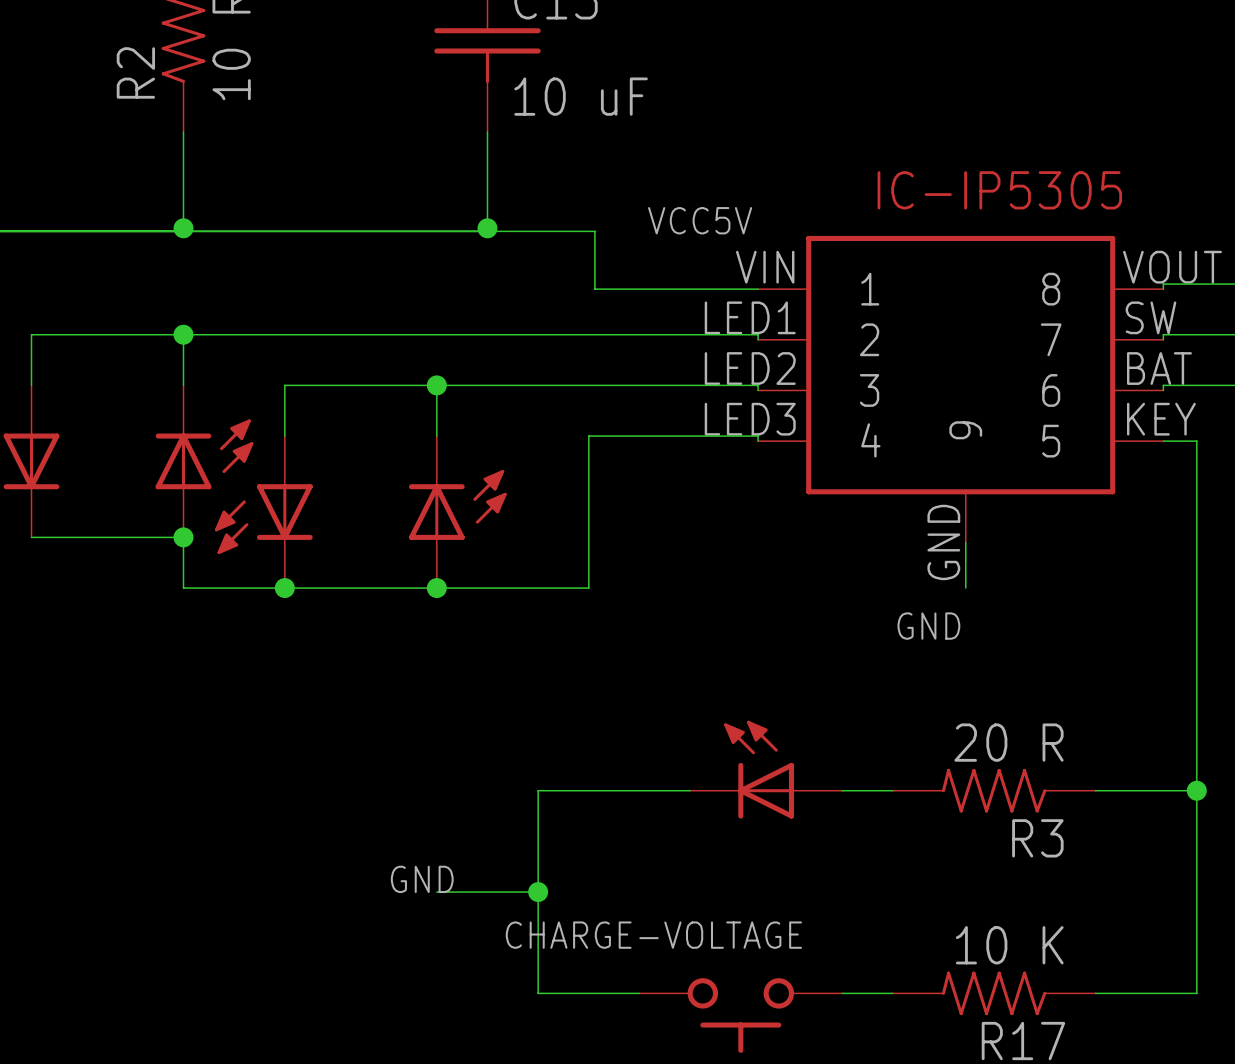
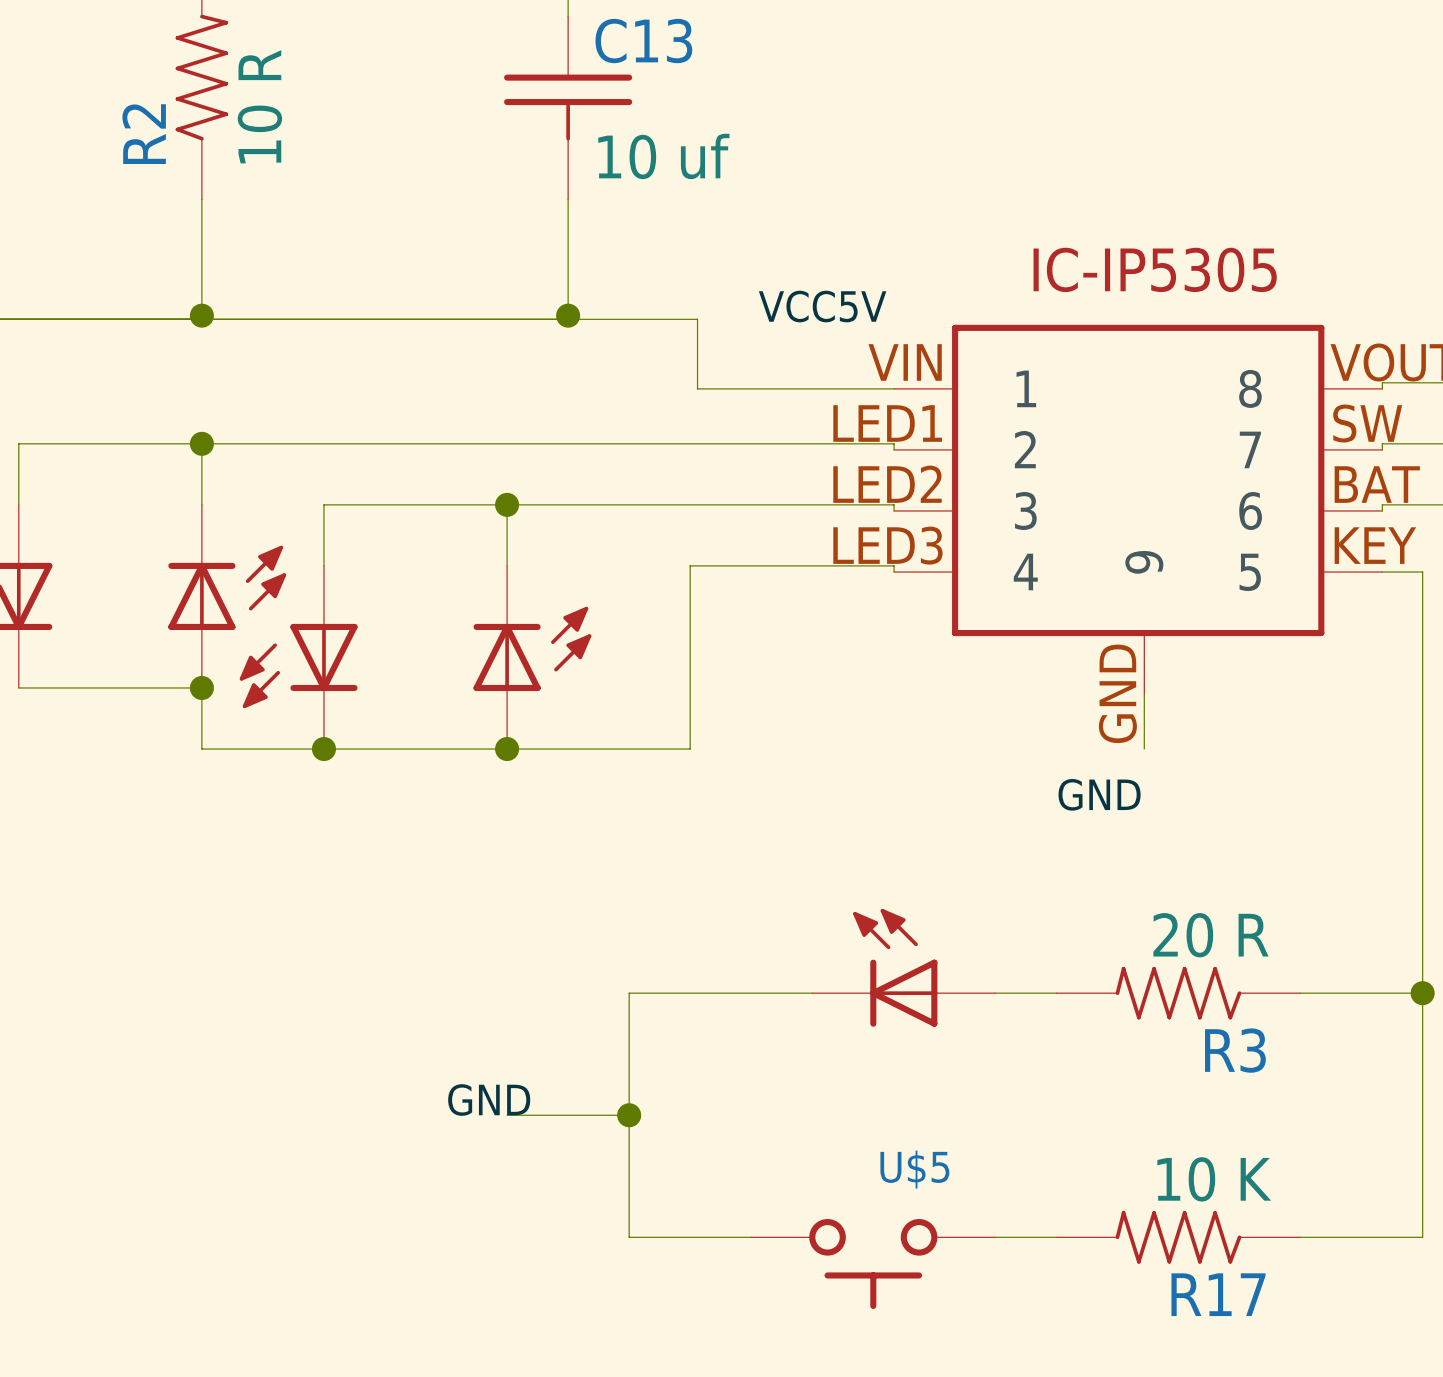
C13 value: 10 uF (581, 96) -> 10 uf (663, 156)
CHARGE-VOLTAGE name: CHARGE-VOLTAGE (653, 935) -> U$5 (914, 1169)

